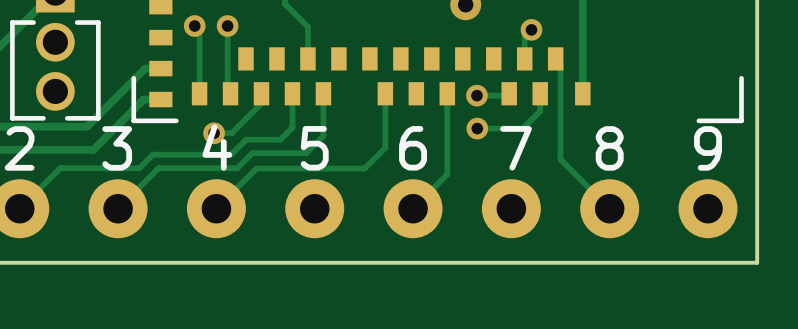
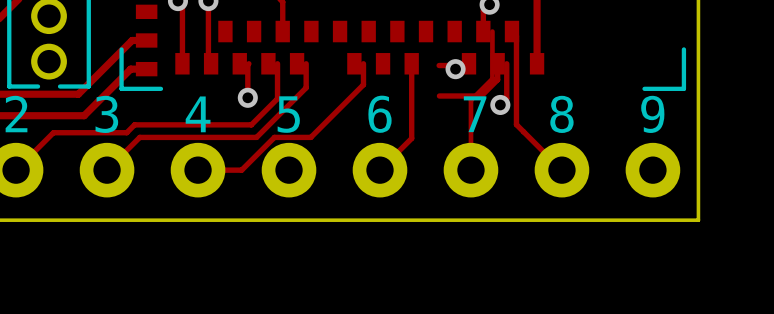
track: none -> (492, 31) (492, 78) (470, 100) (470, 170)
track: (261, 93) (261, 103) (231, 133) (214, 133) -> none
track: none -> (248, 63) (247, 97)
track: (292, 93) (292, 127) (280, 139) (246, 139) (231, 154) (152, 154) (147, 159) -> (277, 63) (277, 98) (251, 124) (134, 124)
track: (323, 93) (323, 136) (306, 153) (252, 153) (237, 168) (158, 168) (153, 173) -> (306, 63) (306, 87) (256, 137) (139, 137)
track: (385, 93) (385, 147) (364, 168) (256, 168) (216, 208) -> (363, 63) (363, 84) (310, 137) (274, 137) (241, 170) (198, 170)
track: none -> (506, 63) (506, 98) (500, 104)
via position: (476, 95) -> (455, 69)
via: (477, 128) -> none
via position: (214, 133) -> (247, 97)
via: none -> (500, 104)

